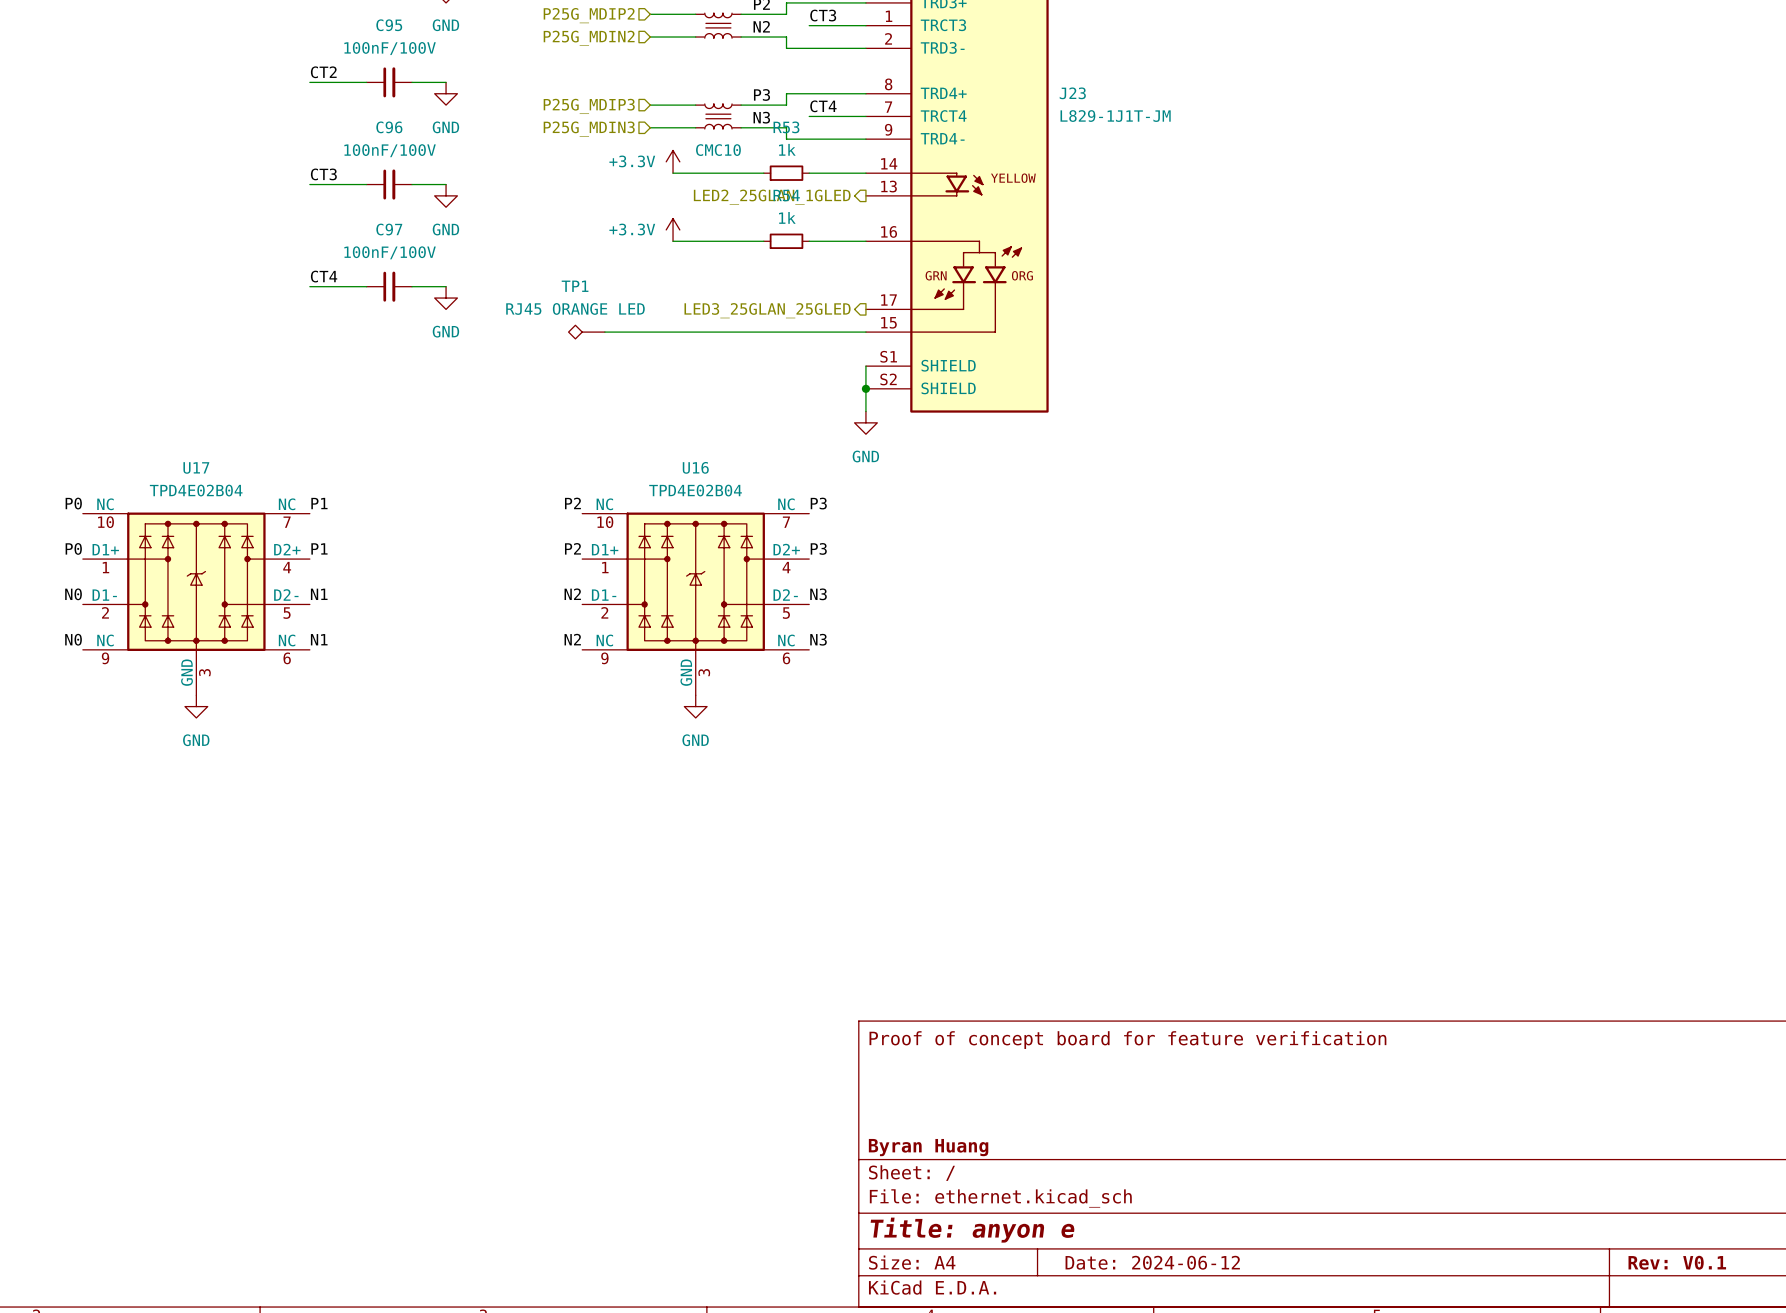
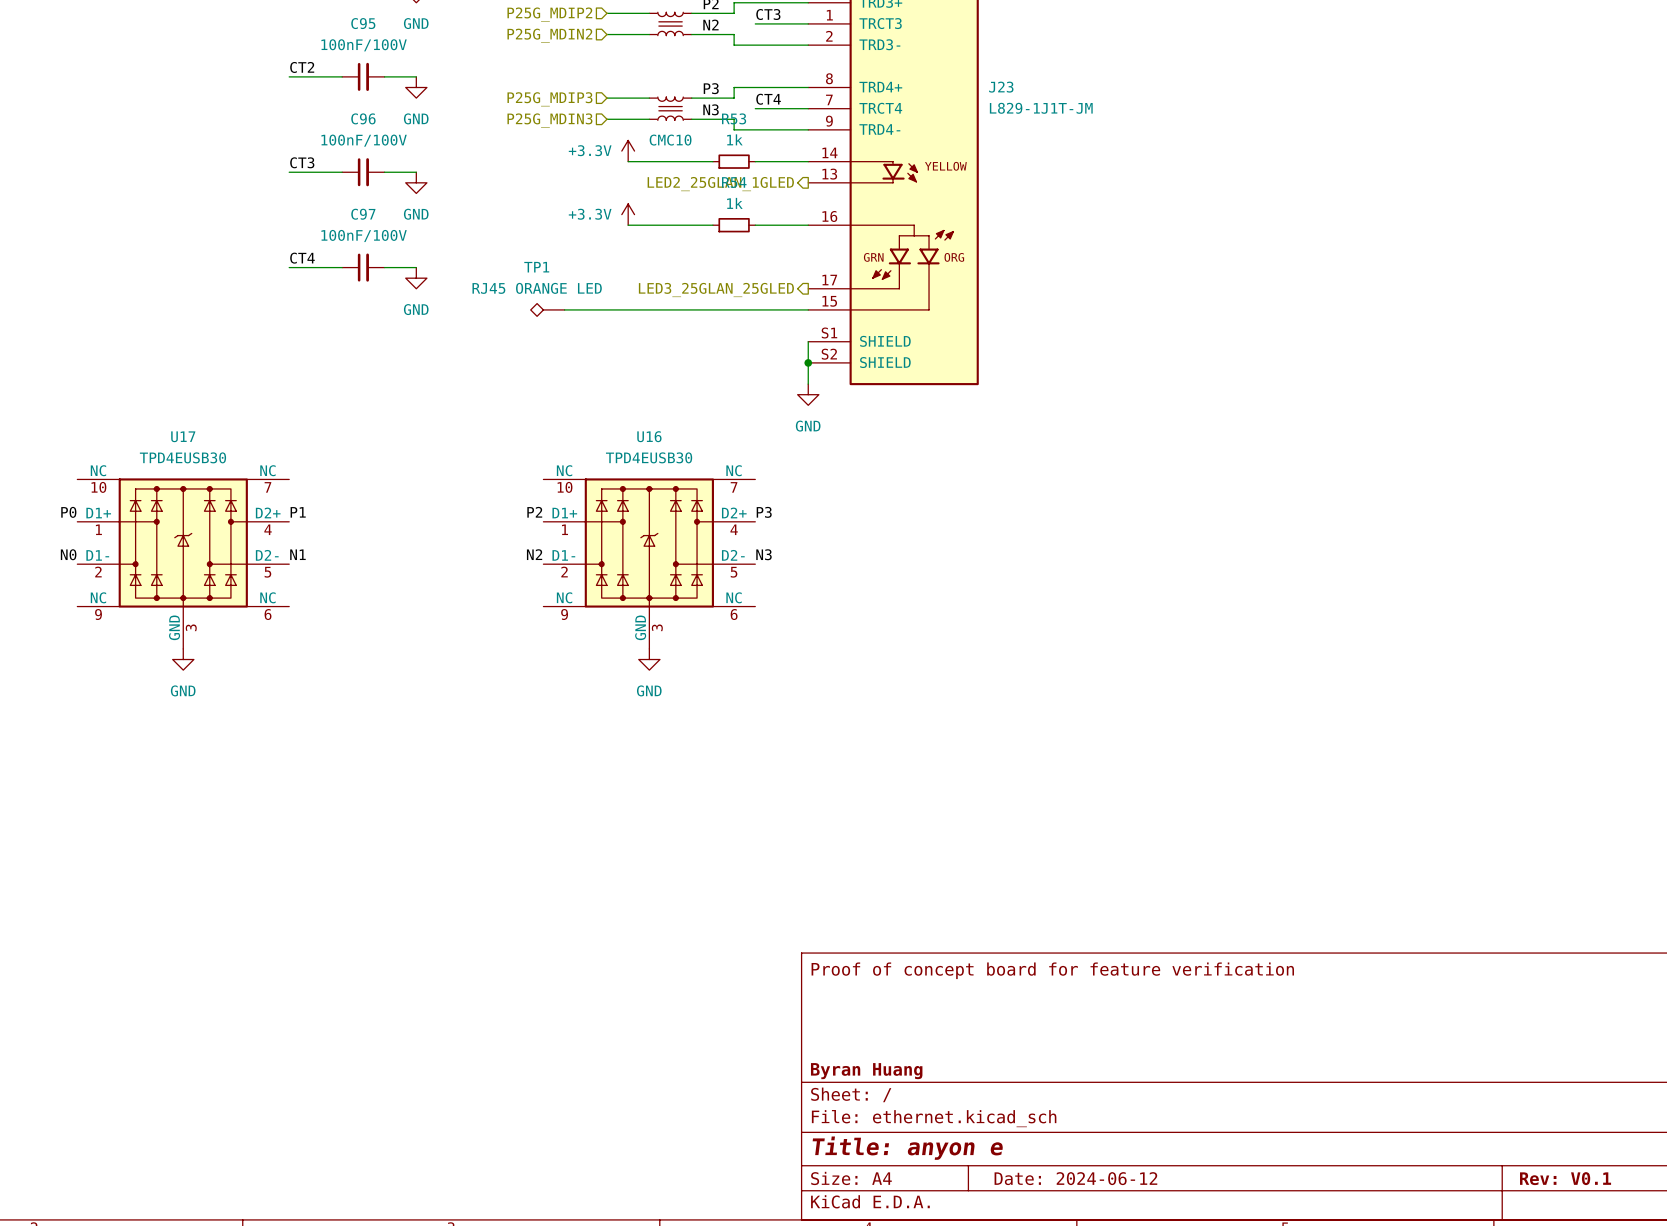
U17 value: TPD4E02B04 (196, 490) -> TPD4EUSB30 (182, 457)
U16 value: TPD4E02B04 (695, 490) -> TPD4EUSB30 (649, 457)
label: P0 (73, 503) -> none
label: P1 (319, 503) -> none
label: P2 (572, 503) -> none
label: P3 (818, 503) -> none
label: N0 (73, 639) -> none
label: N1 (319, 639) -> none
label: N2 (572, 639) -> none
label: N3 (818, 639) -> none

